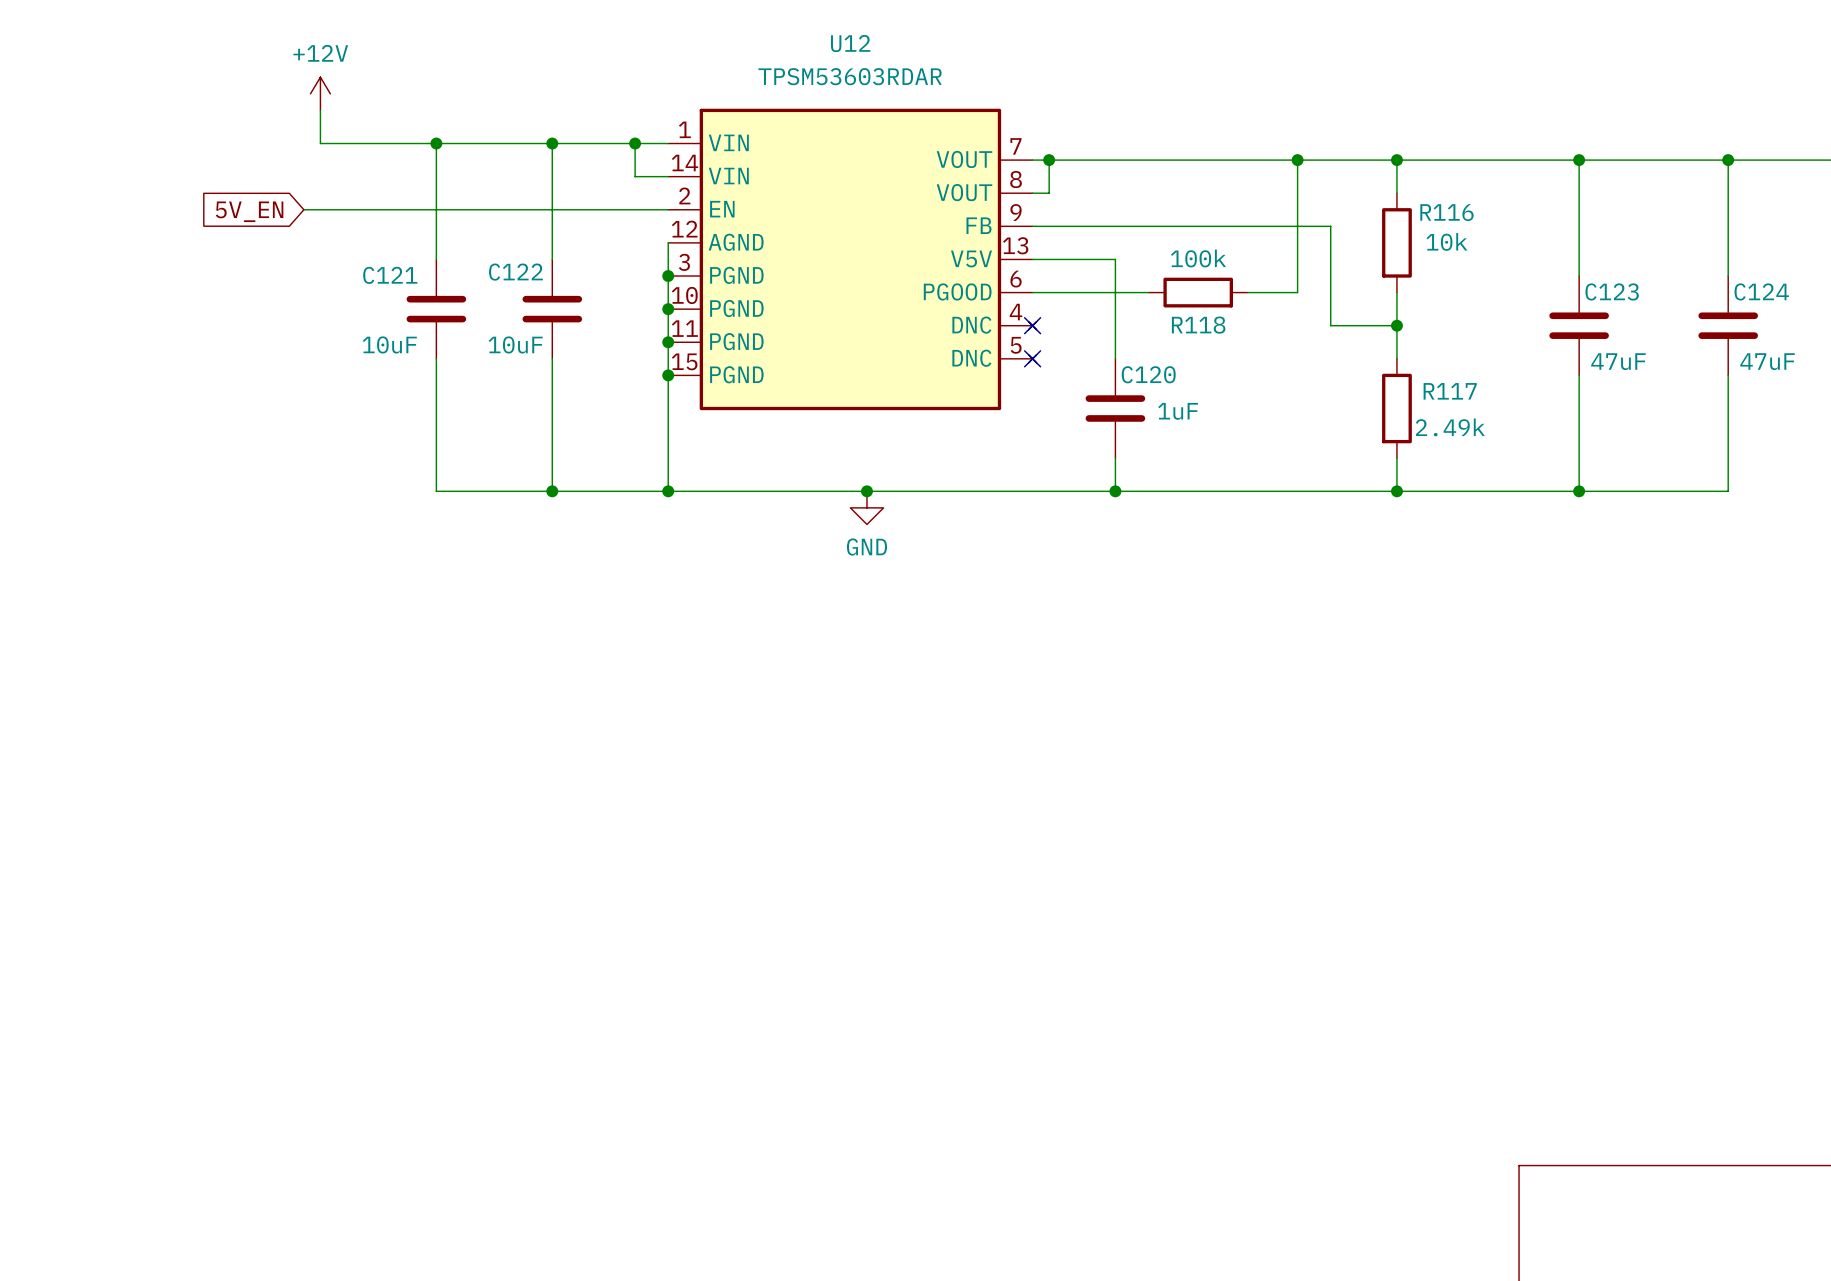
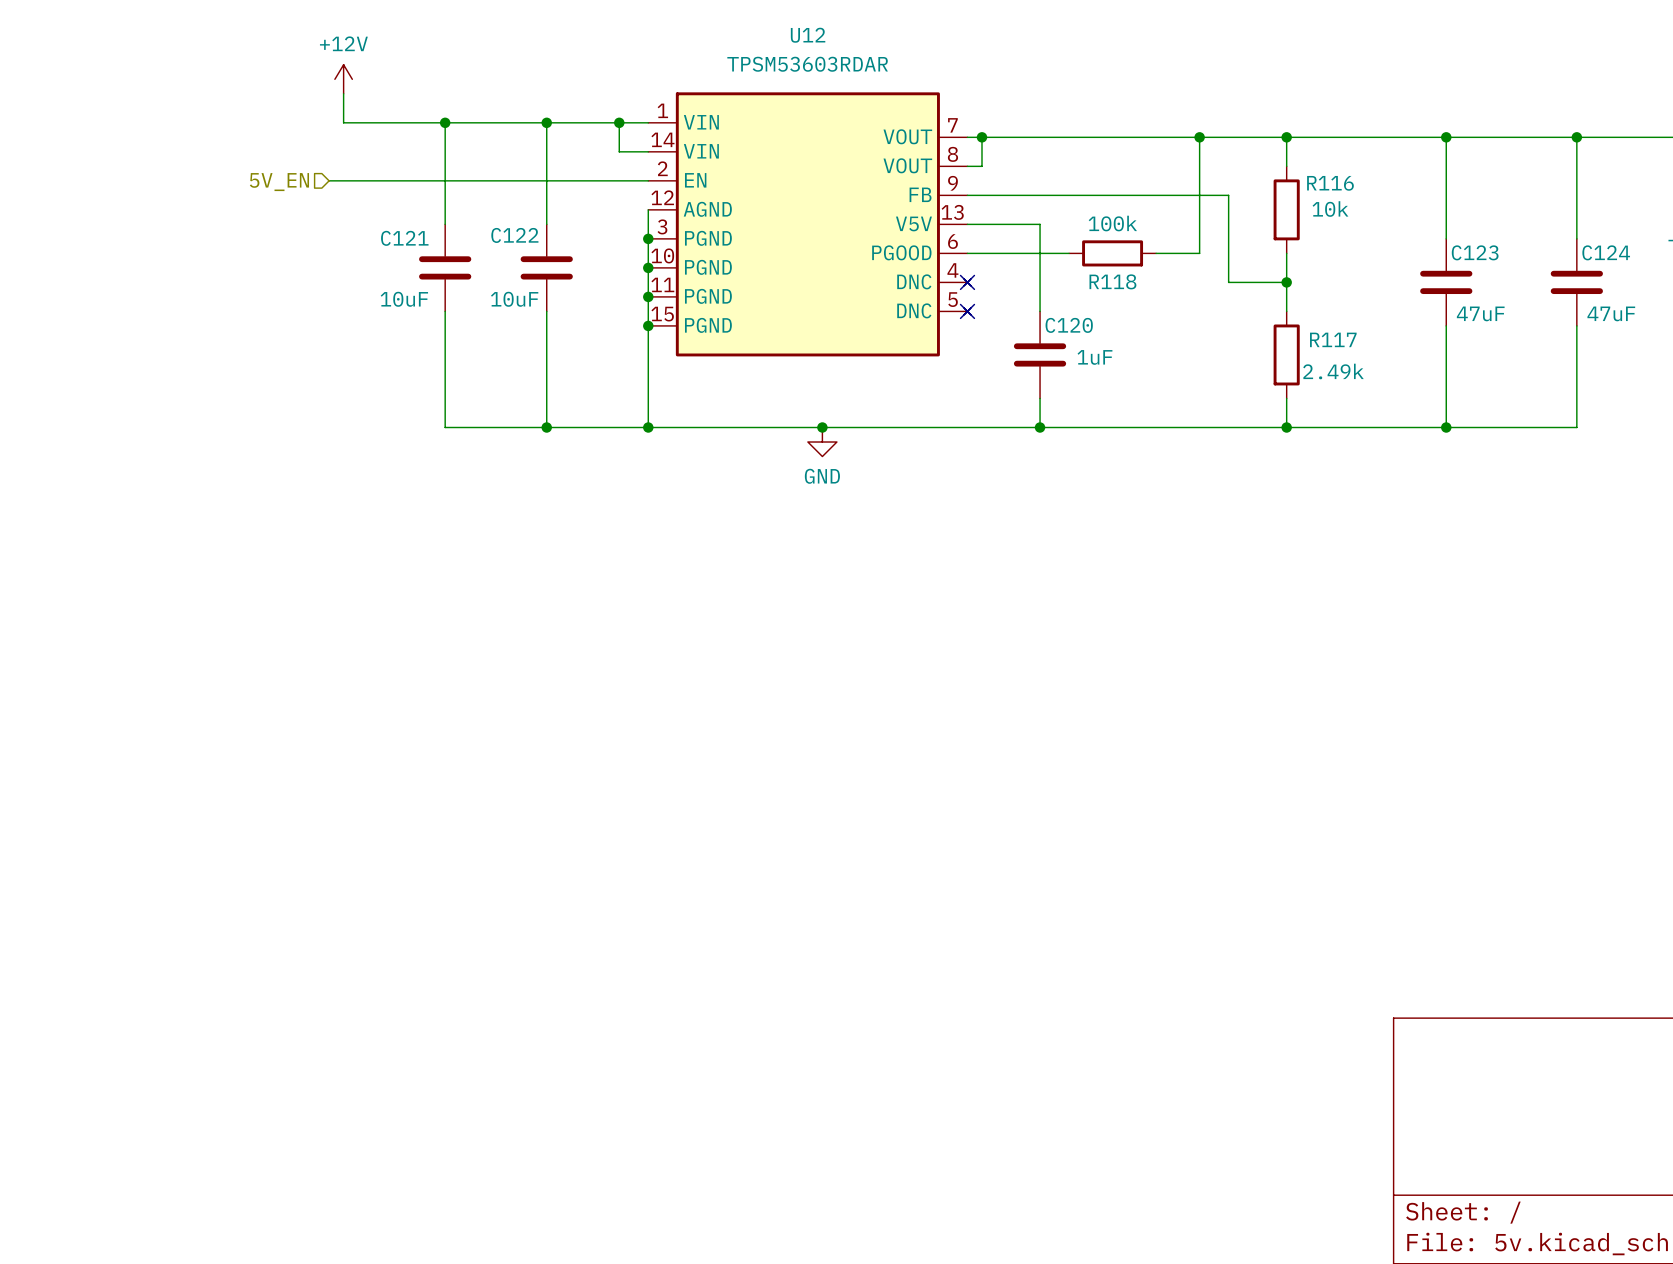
hierarchical label: none -> 5V_EN (279, 182)
global label: 5V_EN (249, 211) -> none

